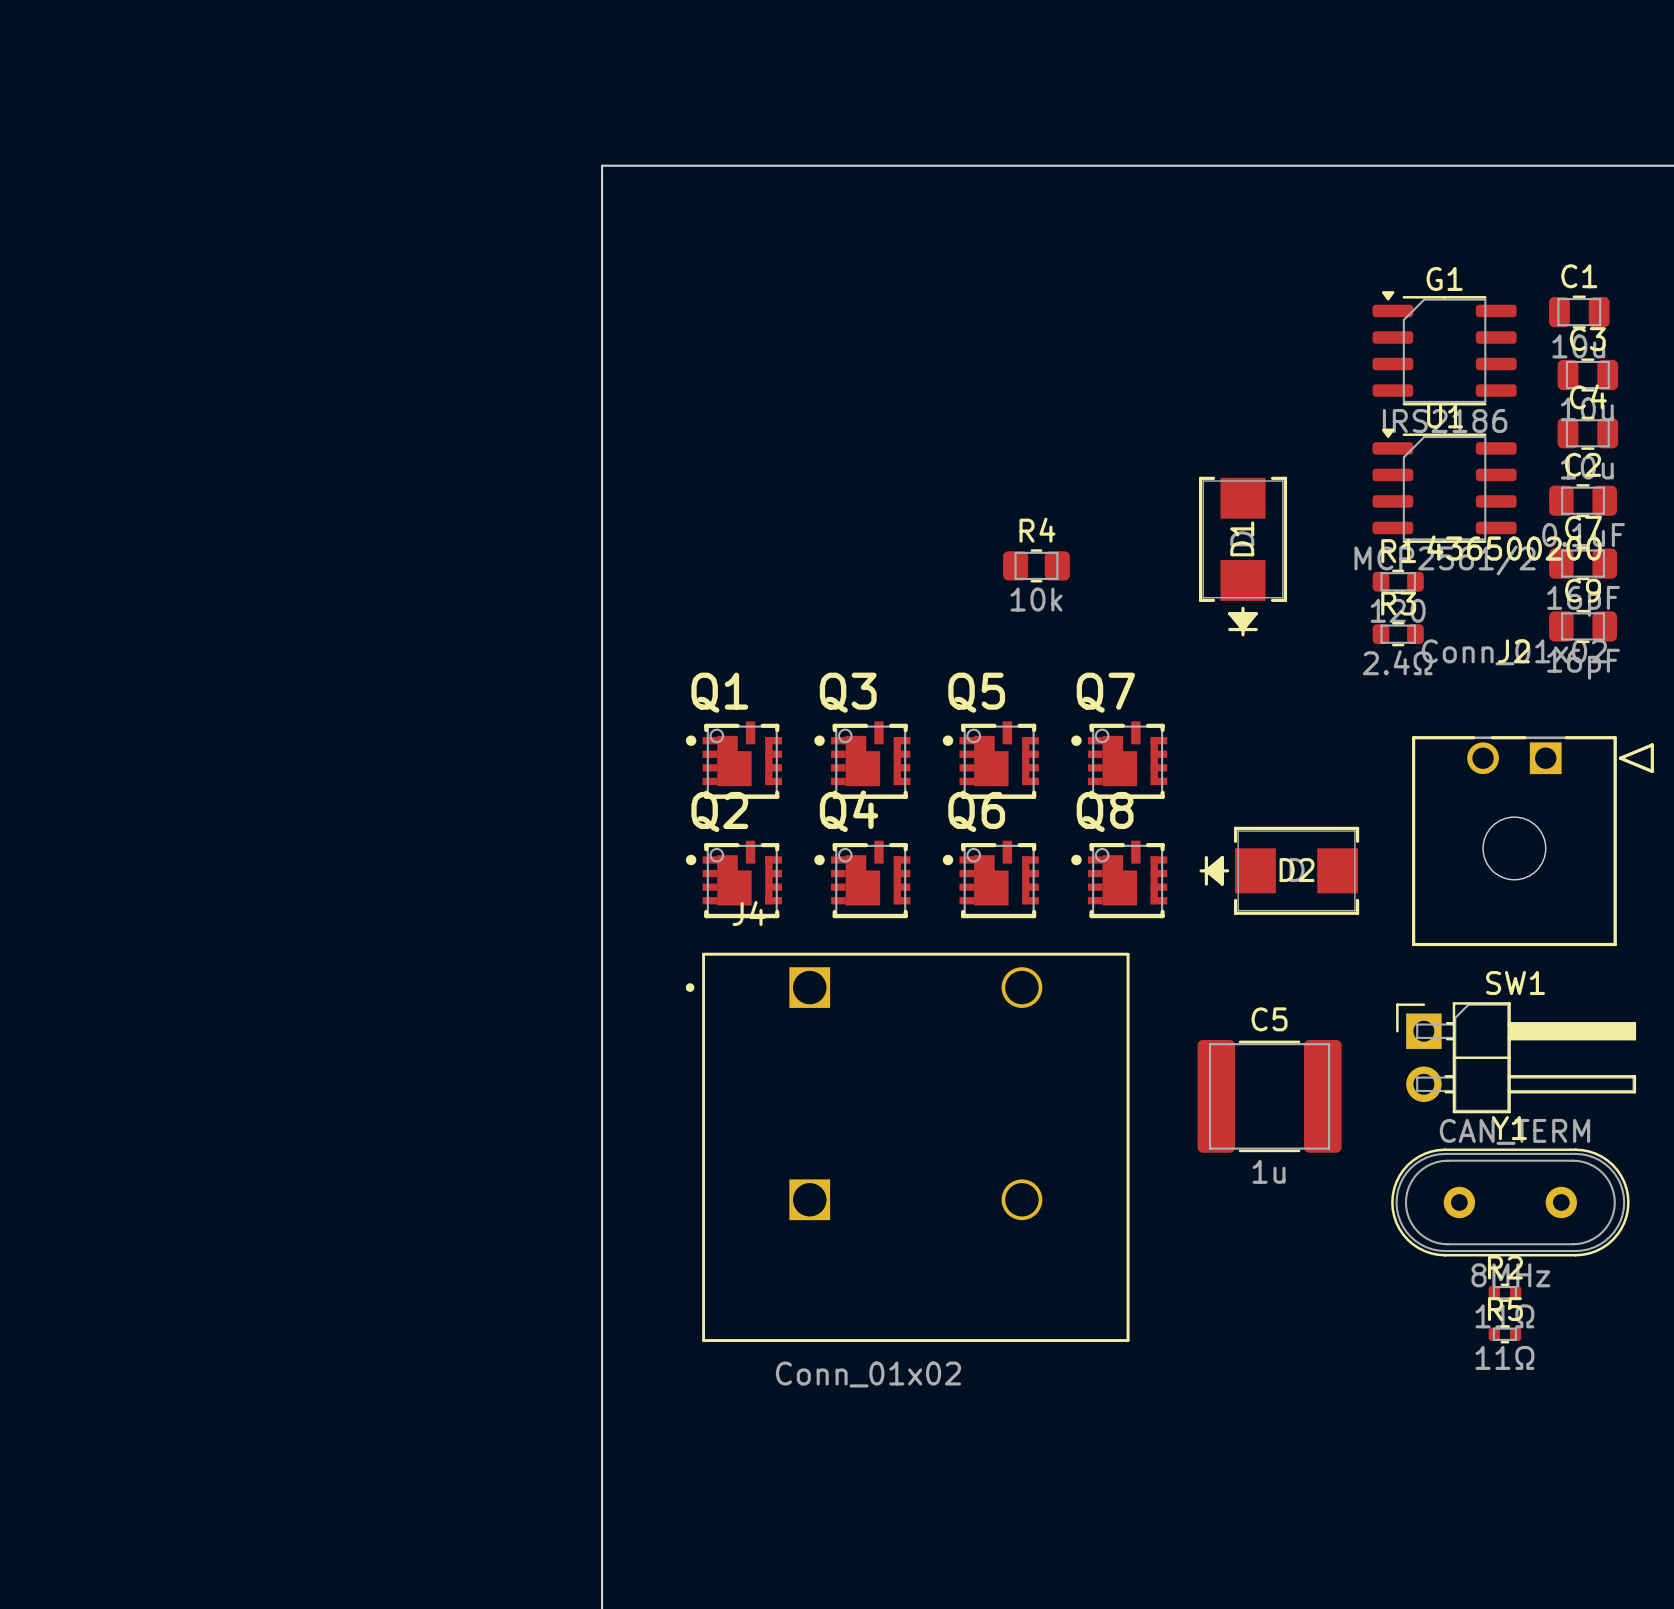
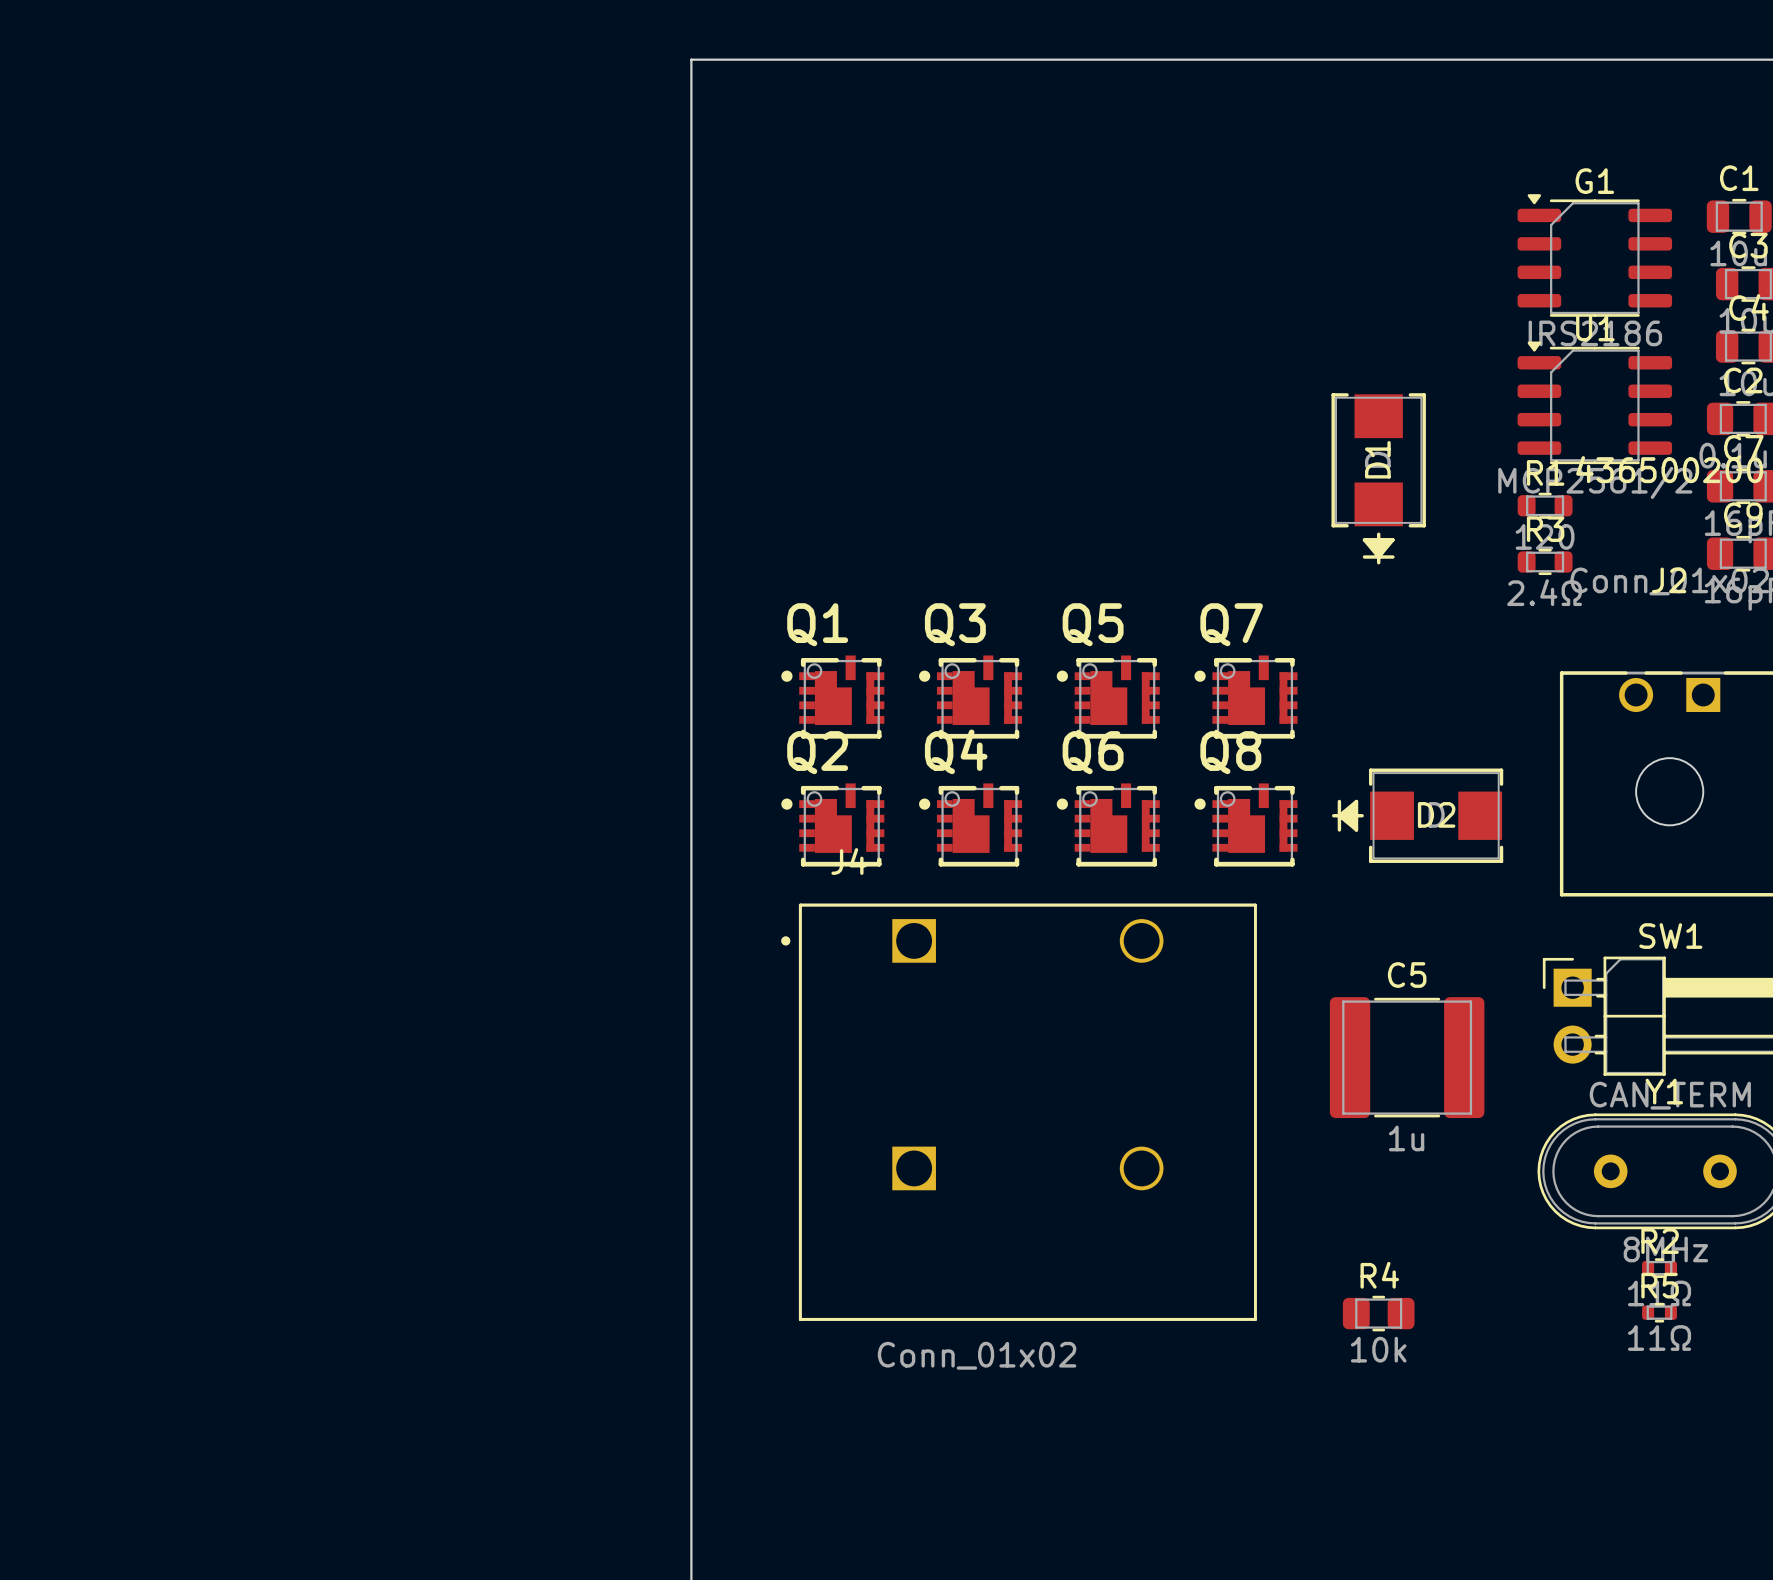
R4 position: (1036, 565) -> (1378, 1313)

